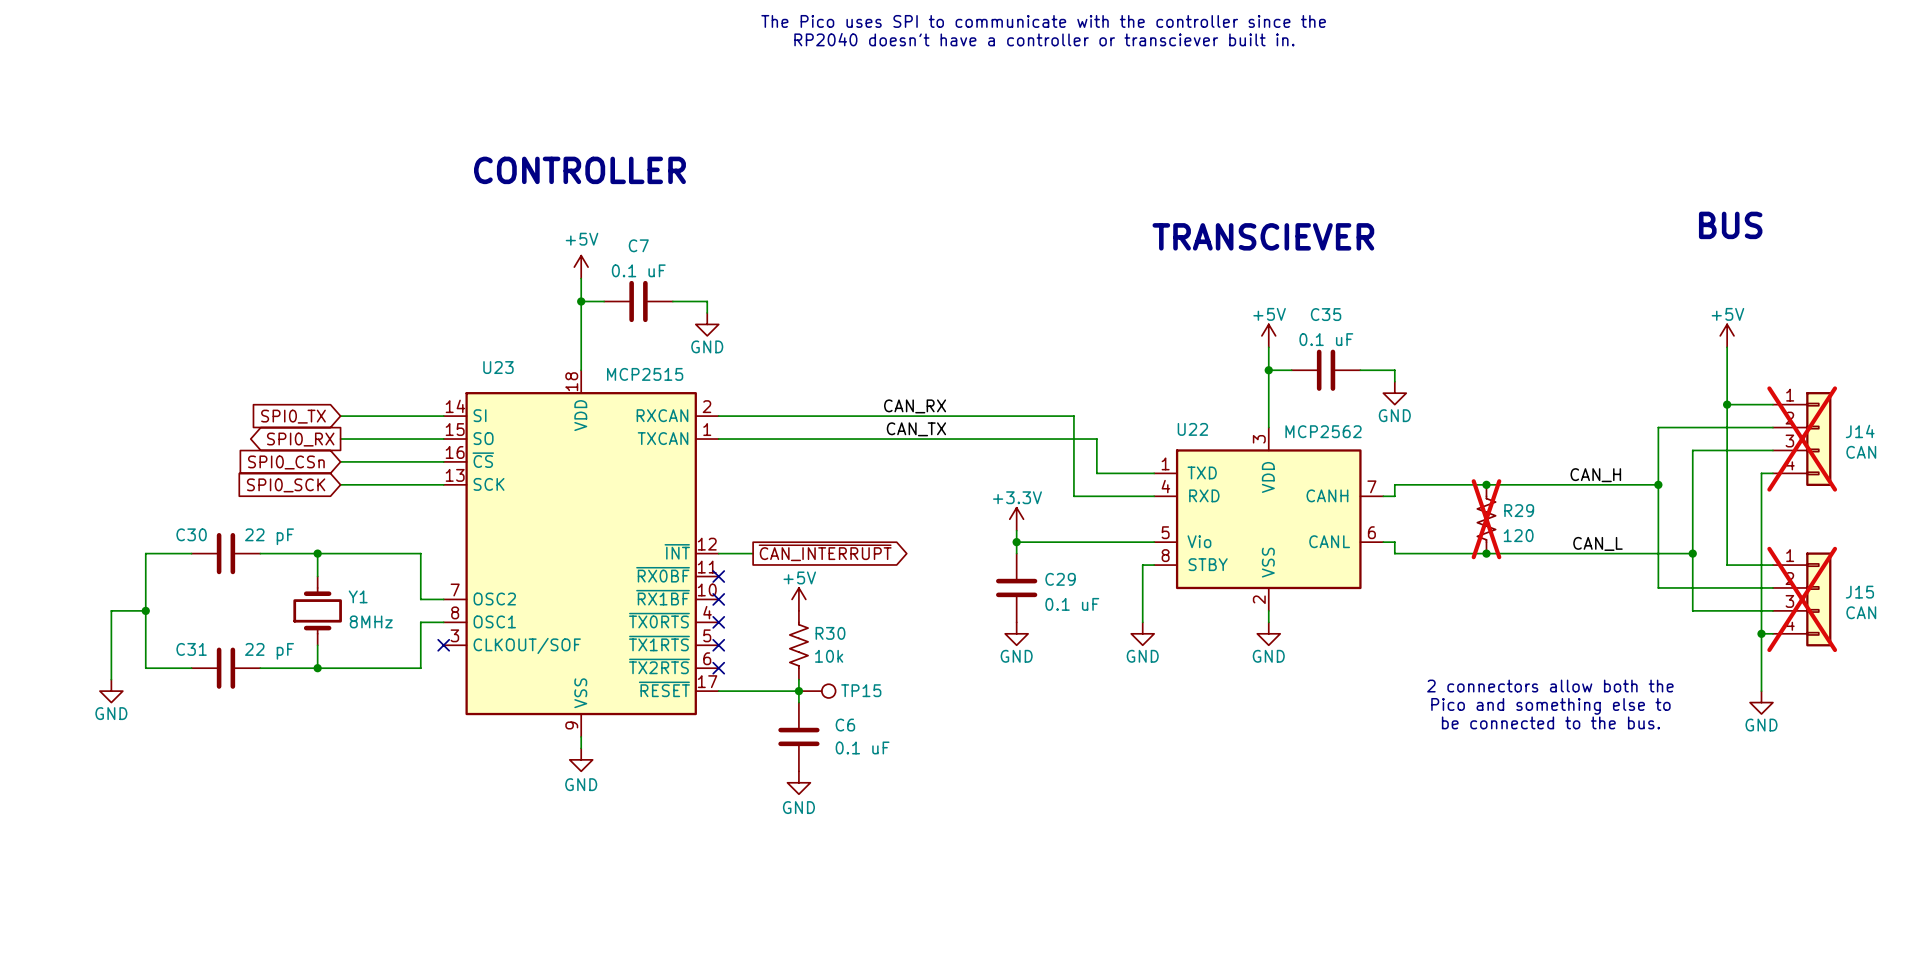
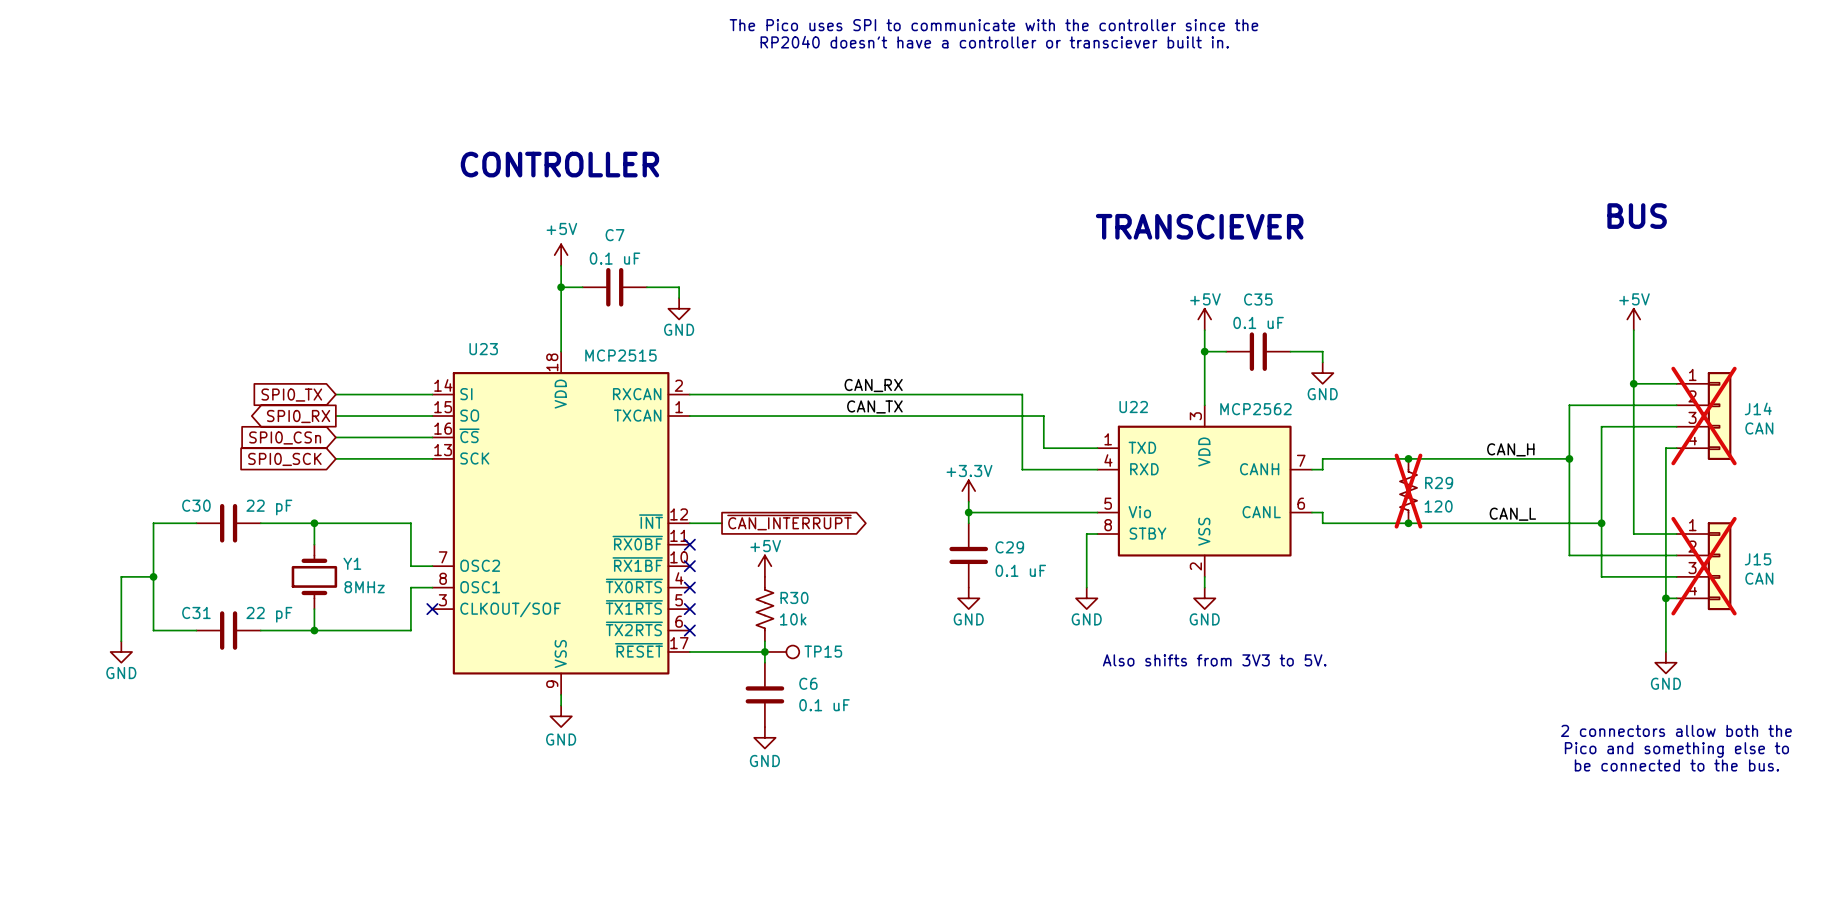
text: 2 connectors allow both the (1550, 686) -> none
text: none -> Also shifts from 3V3 to 5V. (1214, 660)
text: Pico and something else to (1550, 706) -> none
text: be connected to the bus. (1550, 722) -> none
text: none -> 2 connectors allow both the (1676, 730)
text: none -> Pico and something else to (1676, 749)
text: none -> be connected to the bus. (1676, 765)

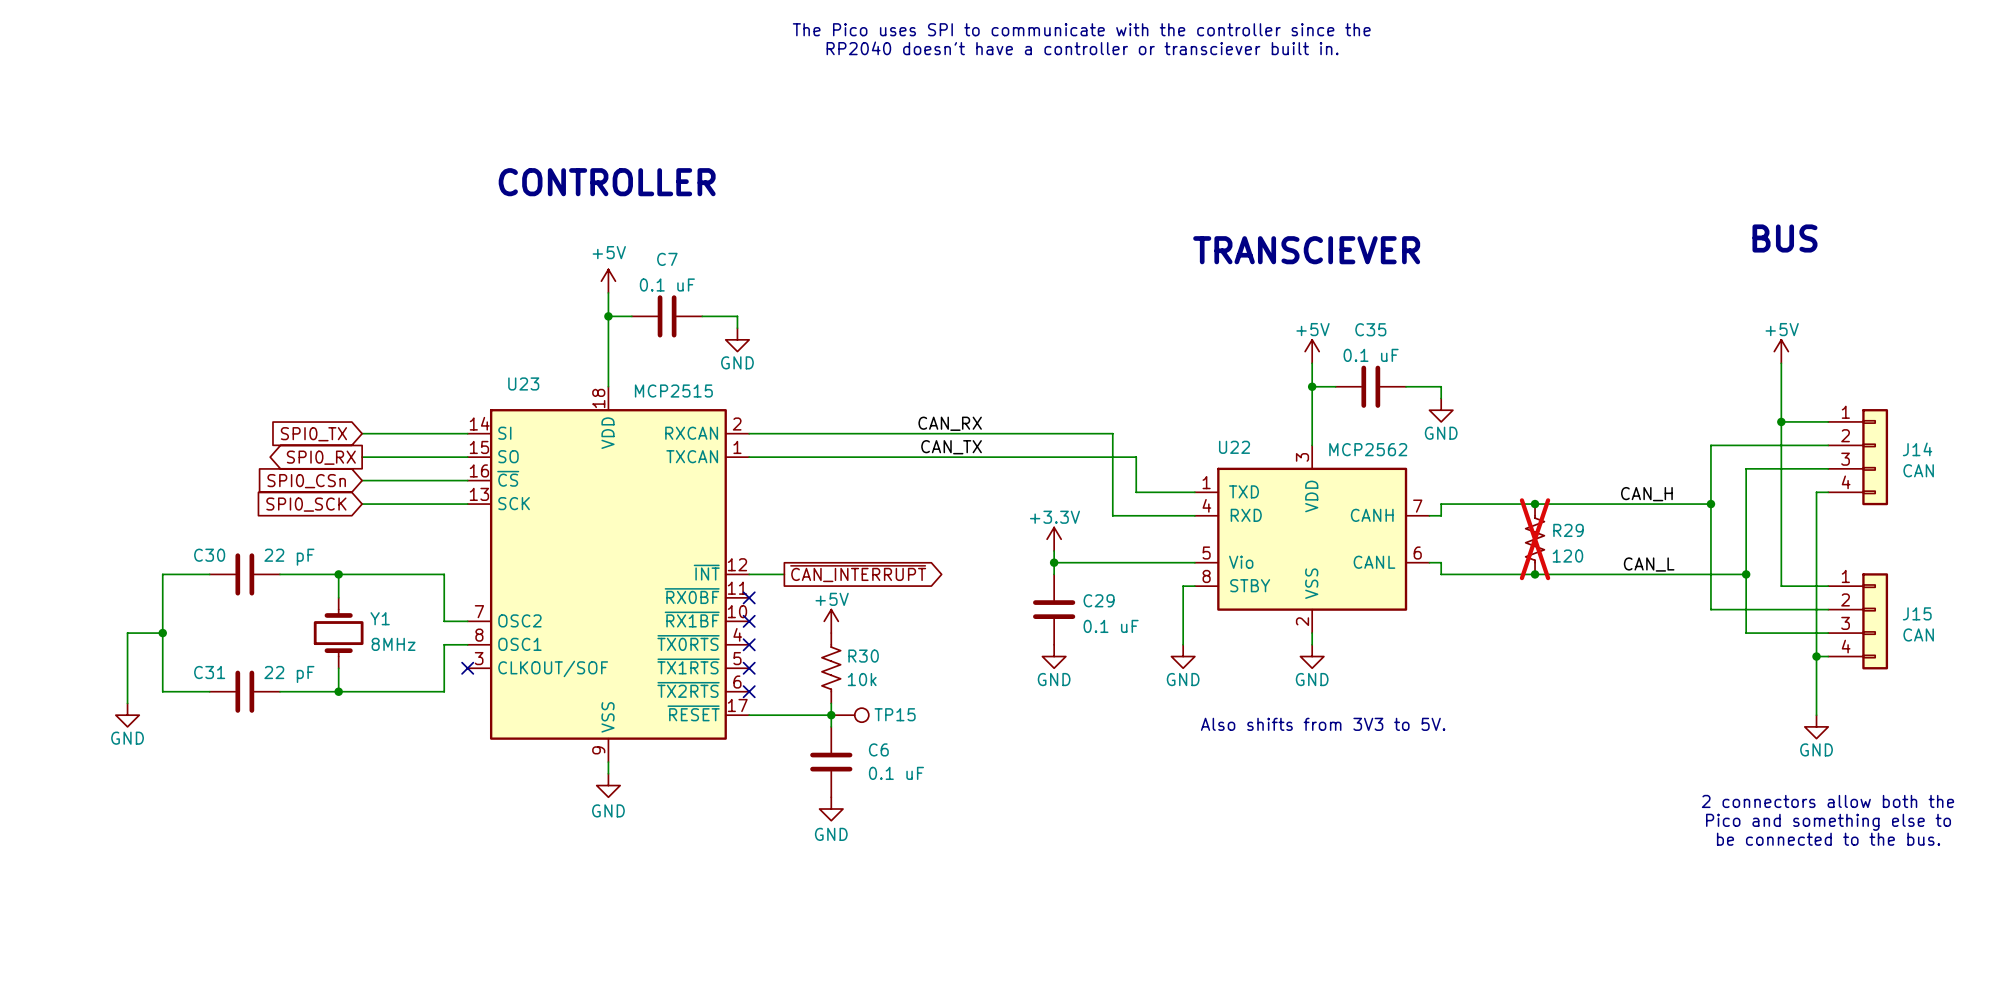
J14 do-not-place cross: (1704, 416) -> none
J15 do-not-place cross: (1704, 566) -> none

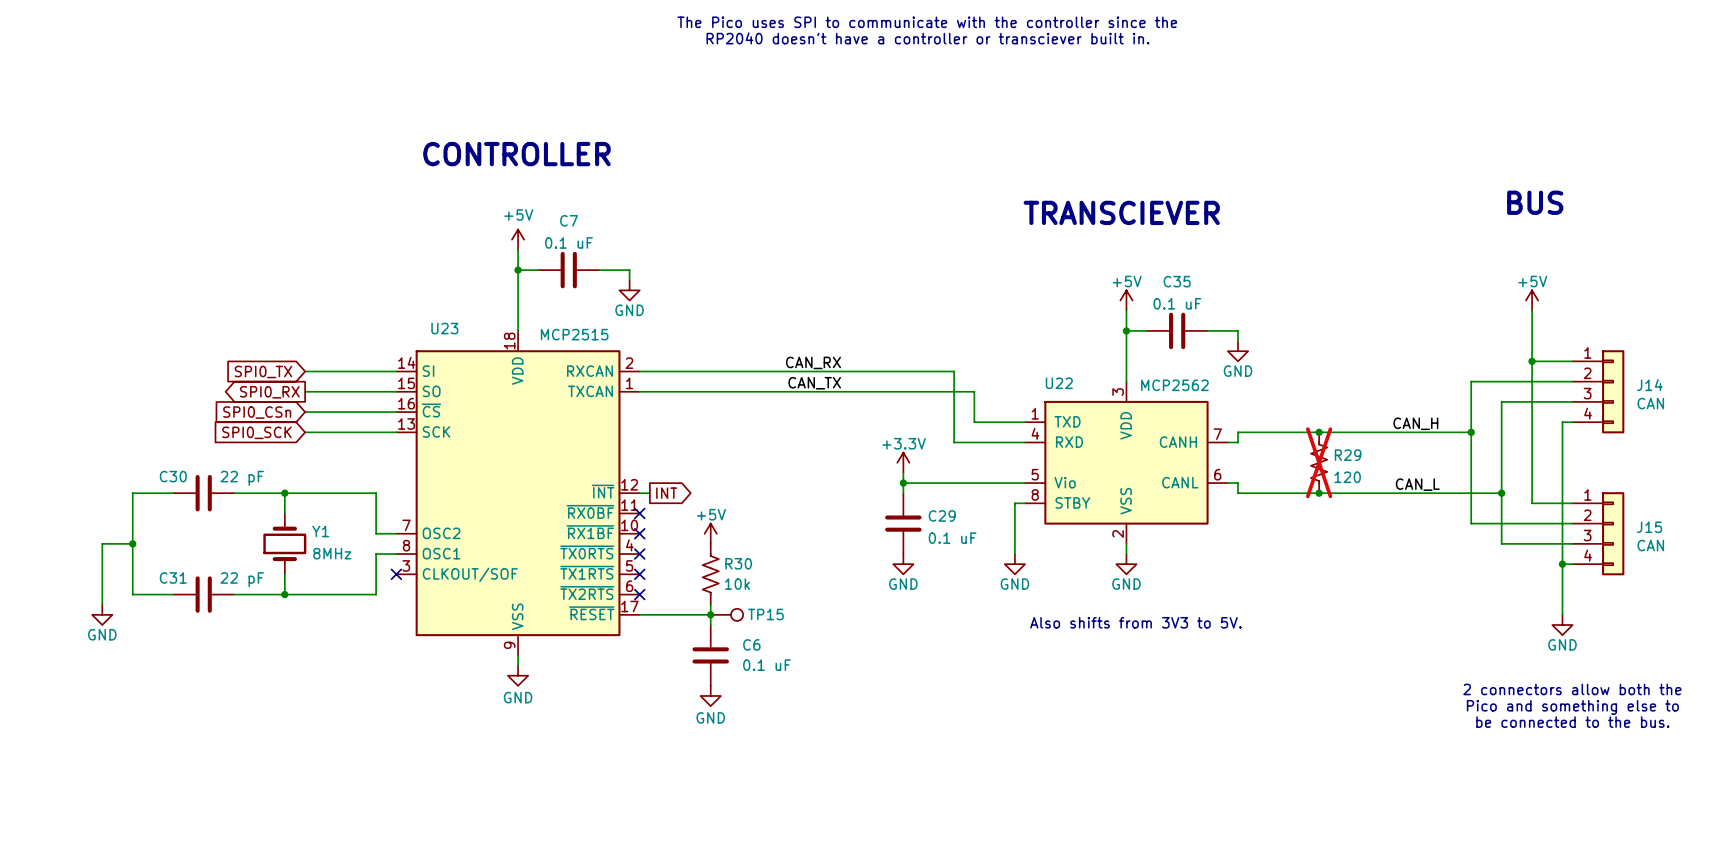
global label: ~{CAN_INTERRUPT} (858, 573) -> none
wire: (760, 574) (784, 574) -> none
global label: none -> INT (666, 493)

